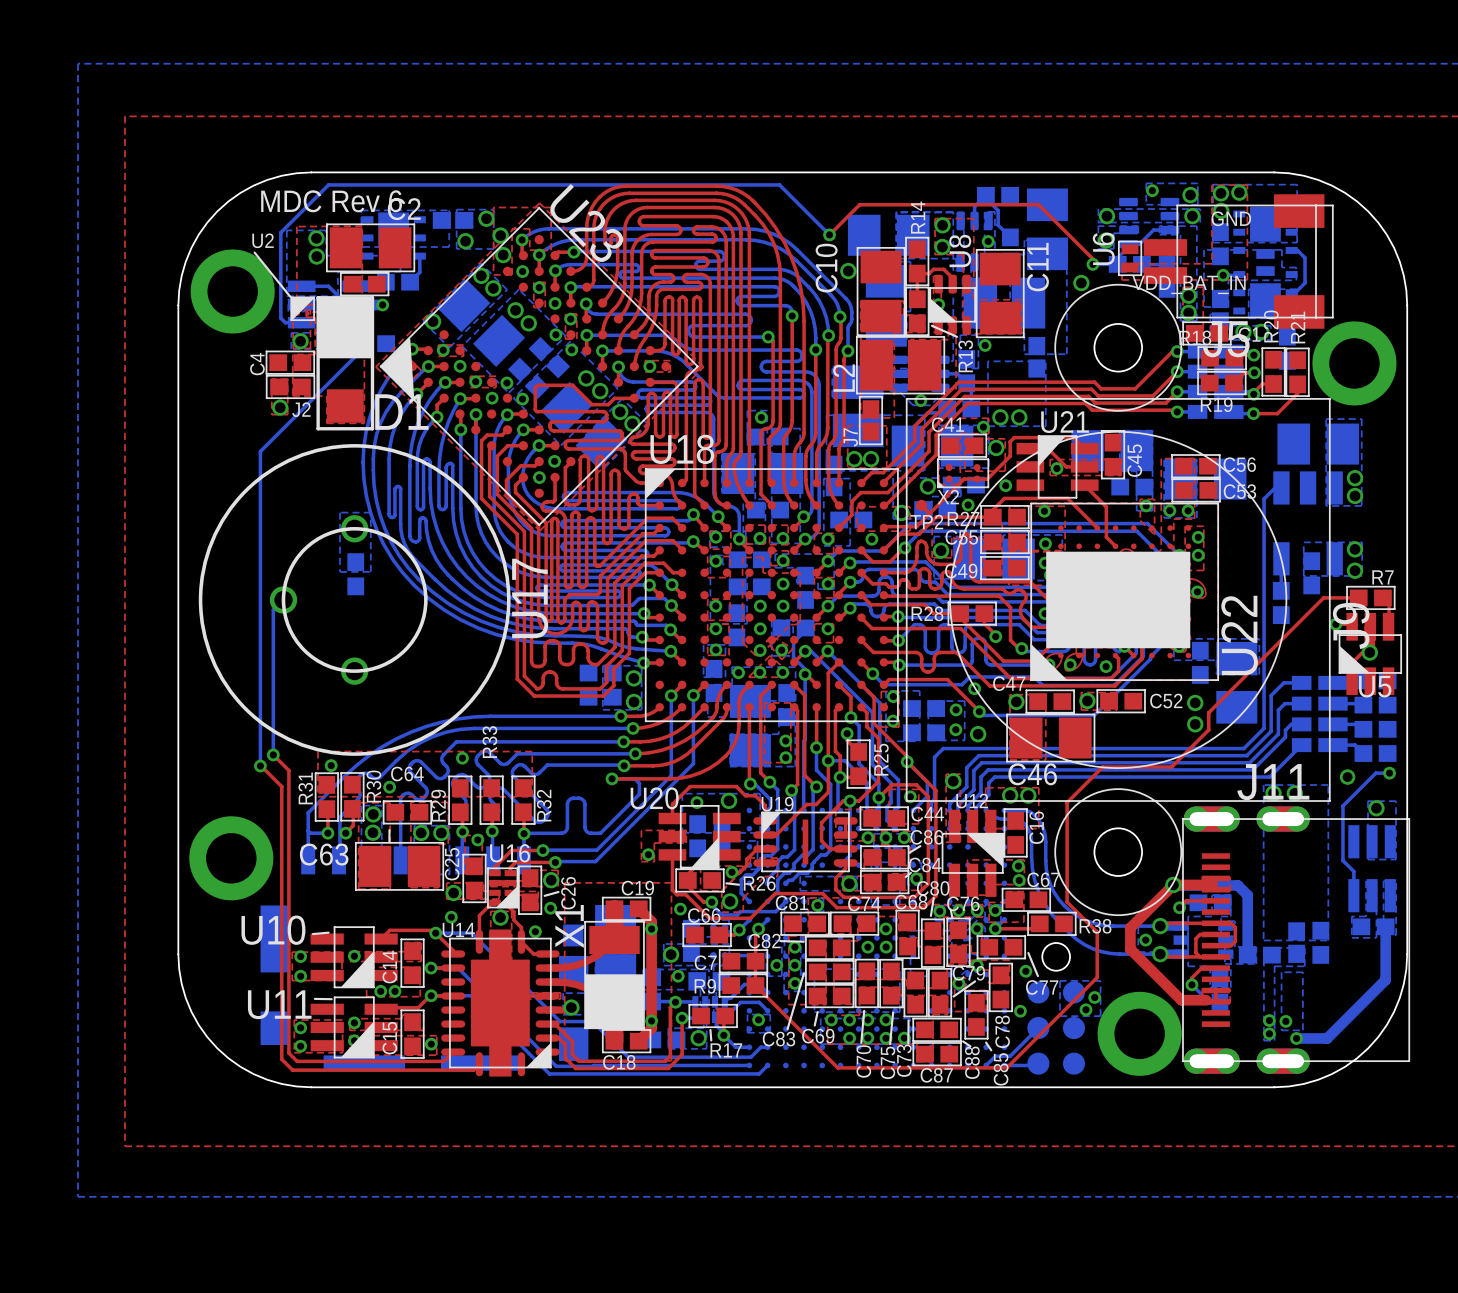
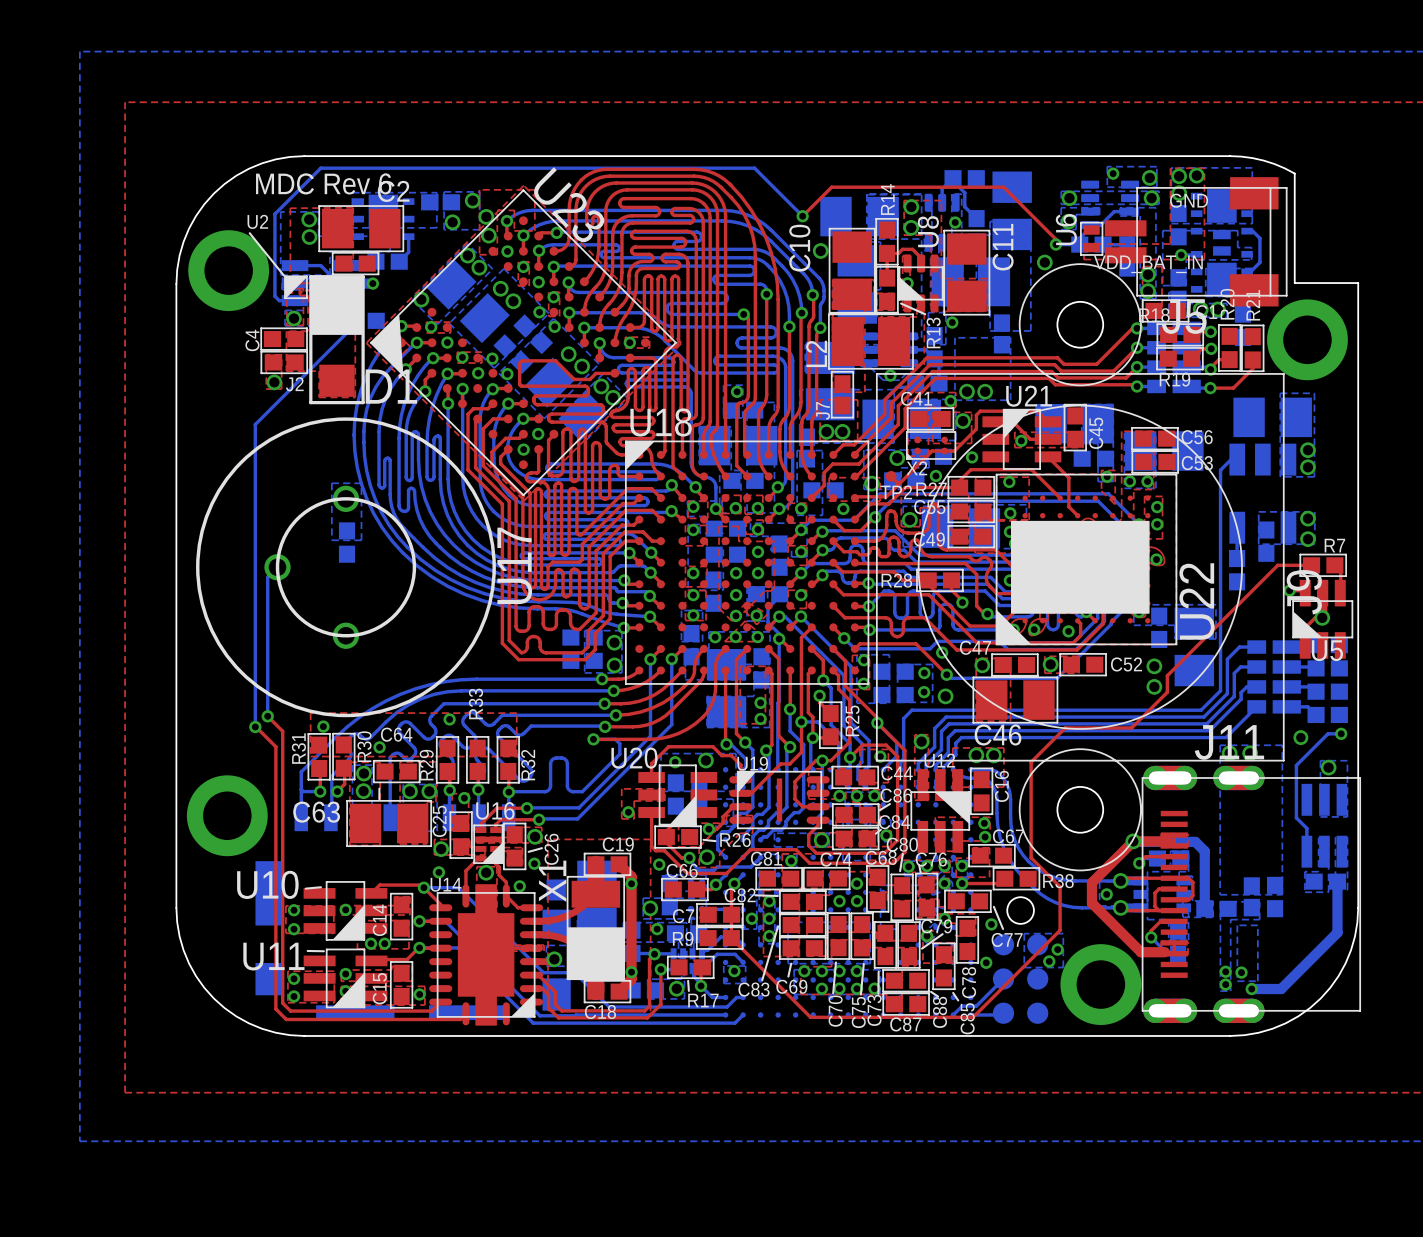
board edge: (1274, 172) (1303, 175) (1331, 185) (1344, 192) (1368, 211) (1386, 234) (1394, 247) (1403, 275) (1407, 305) -> (1230, 156) (1263, 160) (1294, 173) (1294, 283) (1358, 284)

